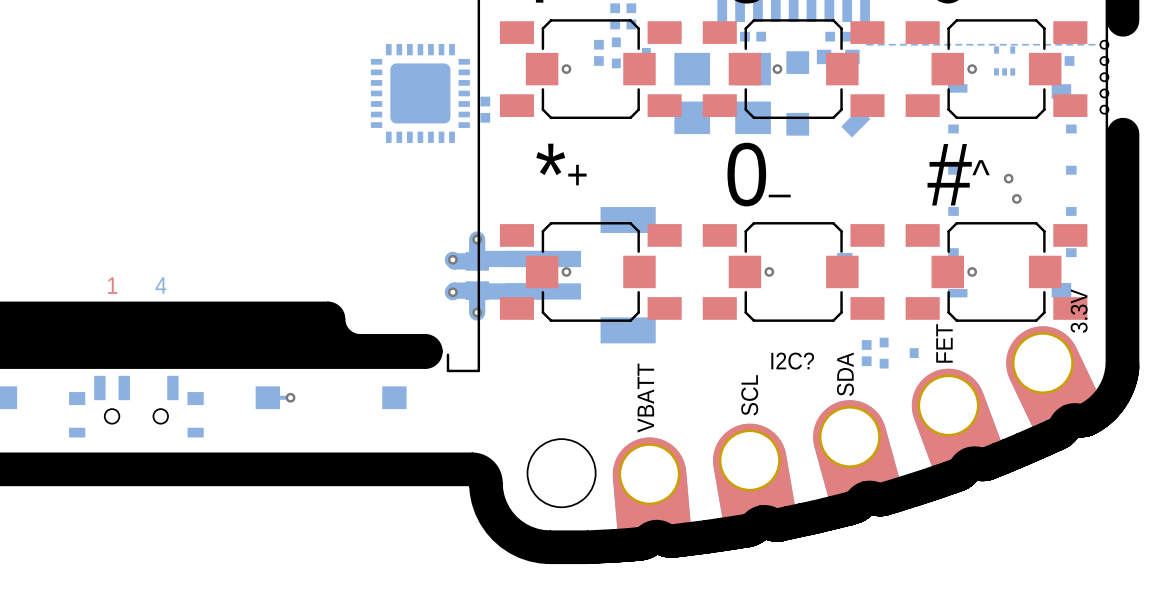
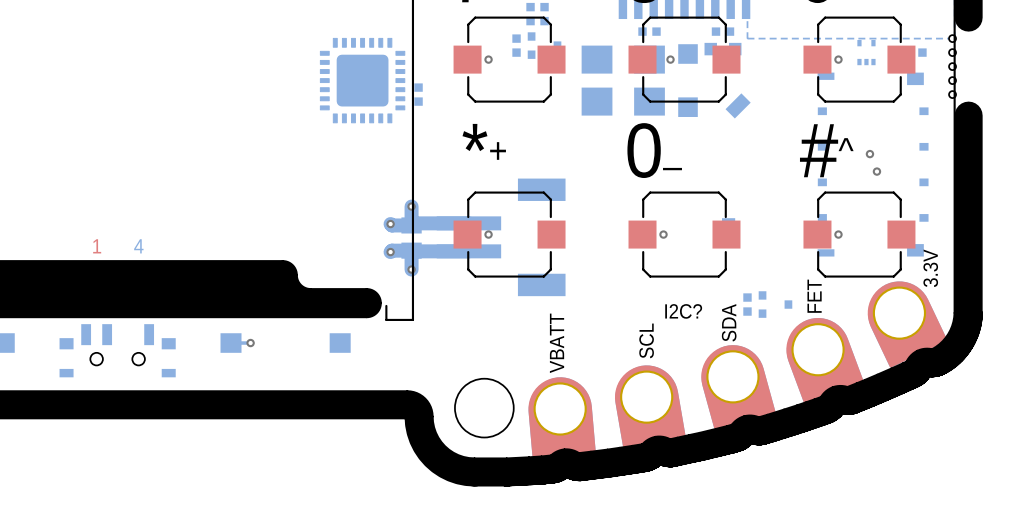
part footprint: [499, 19, 682, 120] -> [453, 16, 566, 103]
part footprint: [702, 19, 885, 120] -> [628, 16, 741, 103]
part footprint: [905, 19, 1088, 120] -> [803, 16, 916, 103]
part footprint: [499, 222, 682, 322] -> [453, 191, 566, 278]
part footprint: [702, 222, 885, 322] -> [628, 191, 741, 278]
part footprint: [905, 222, 1088, 322] -> [803, 191, 916, 278]

